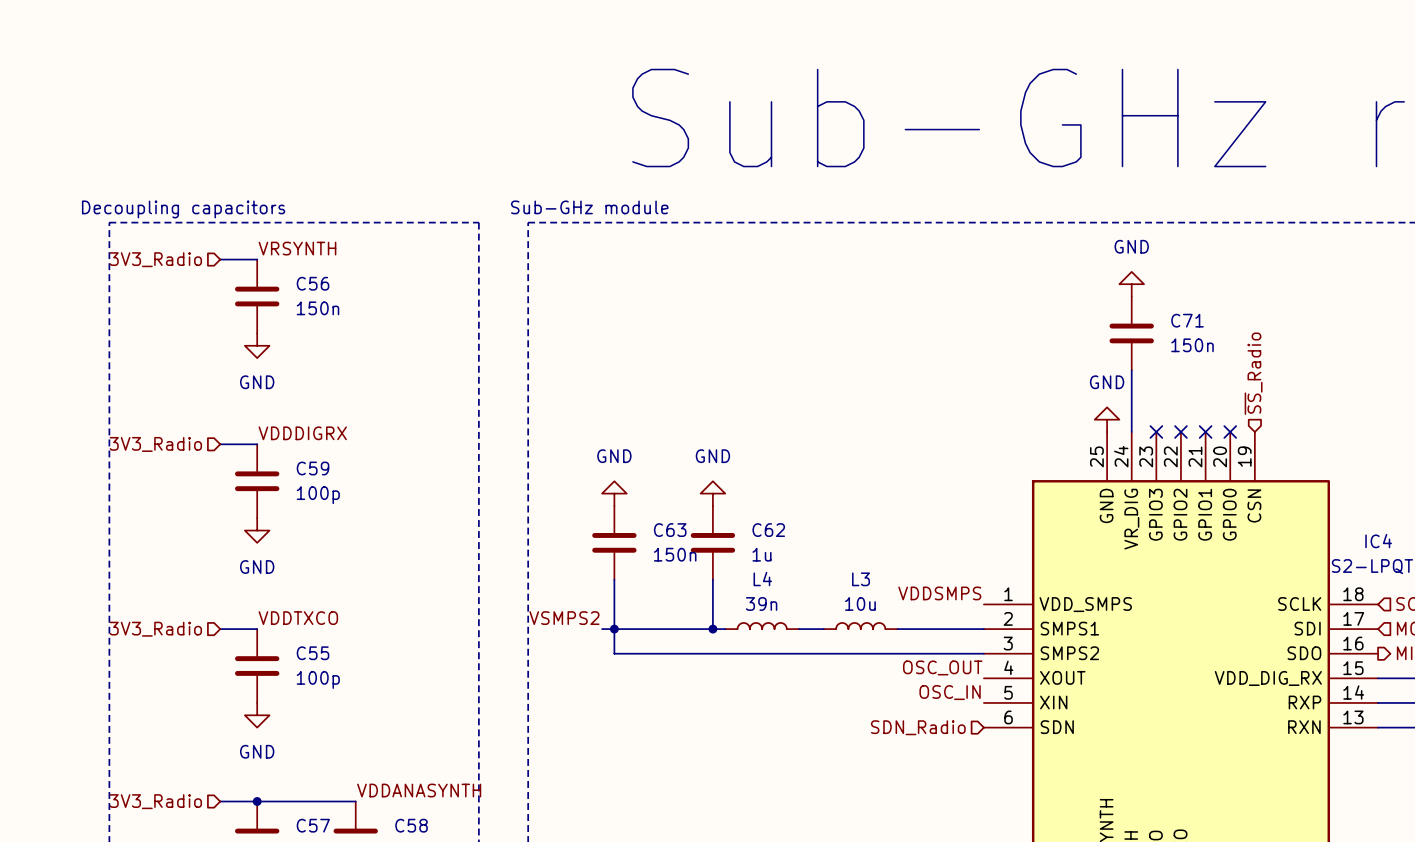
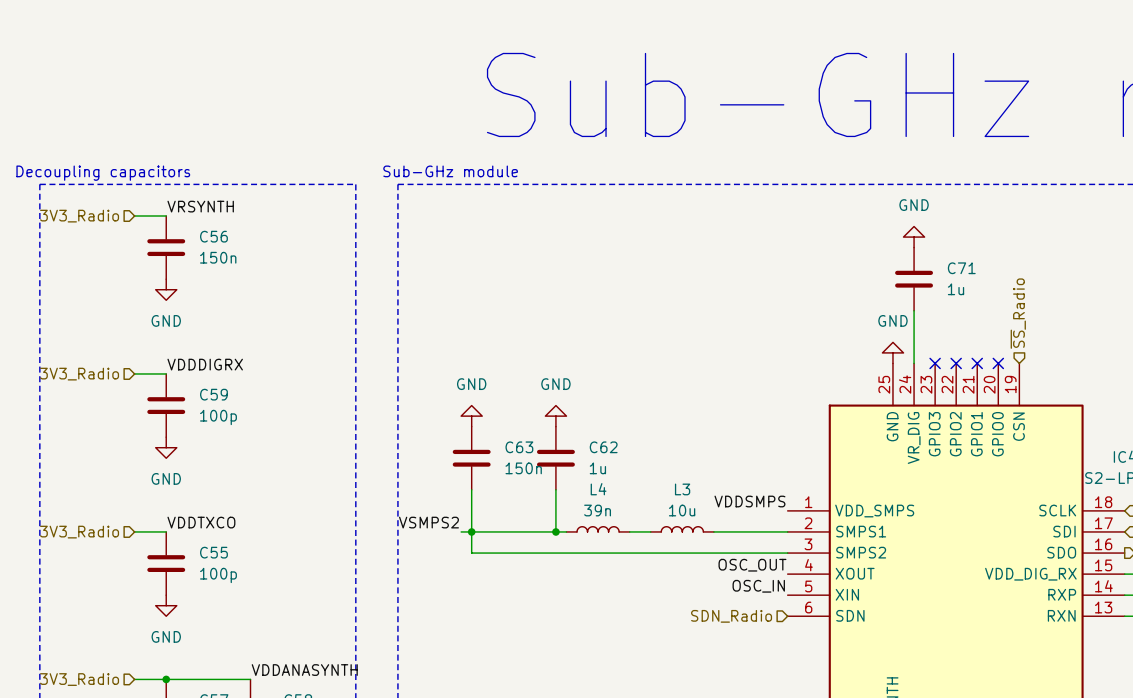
C71 value: 150n (1192, 345) -> 1u (956, 289)

